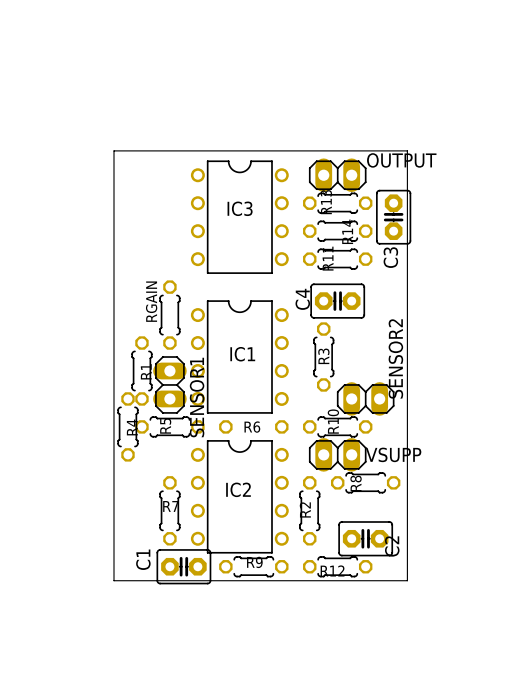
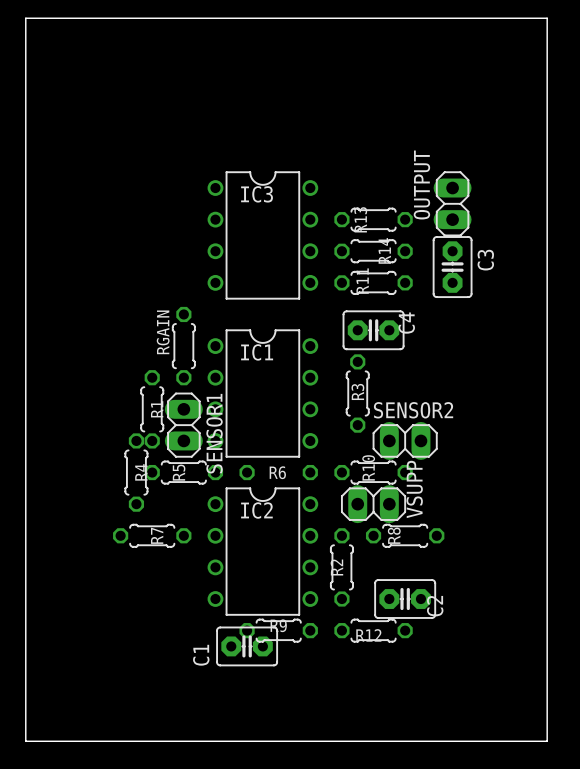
board edge: none -> (25, 18) (547, 18) (547, 741) (25, 741) (25, 18)
board edge: (114, 150) (407, 150) (407, 580) (114, 580) (114, 150) -> none
OUTPUT name position: OUTPUT (401, 160) -> OUTPUT (421, 185)
OUTPUT rotation: 0° (337, 175) -> 90° clockwise (452, 203)
OUTPUT position: (337, 175) -> (452, 203)
IC3 name position: IC3 (240, 208) -> IC3 (257, 194)
C3 position: (393, 217) -> (452, 267)
C3 name position: C3 (390, 257) -> C3 (485, 260)
C4 name position: C4 (302, 299) -> C4 (406, 323)
IC1 name position: IC1 (242, 354) -> IC1 (257, 352)
SENSOR2 name rotation: 0° (395, 358) -> 90° clockwise (413, 410)
VSUPP name rotation: 0° (393, 454) -> 90° counterclockwise (414, 489)
IC2 name position: IC2 (238, 489) -> IC2 (256, 510)
R7 rotation: 0° (169, 510) -> 90° clockwise (152, 535)
C1 name position: C1 (143, 559) -> C1 (201, 655)
C1 position: (183, 566) -> (247, 646)

